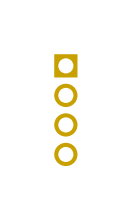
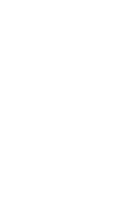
part: (65, 110) -> none

